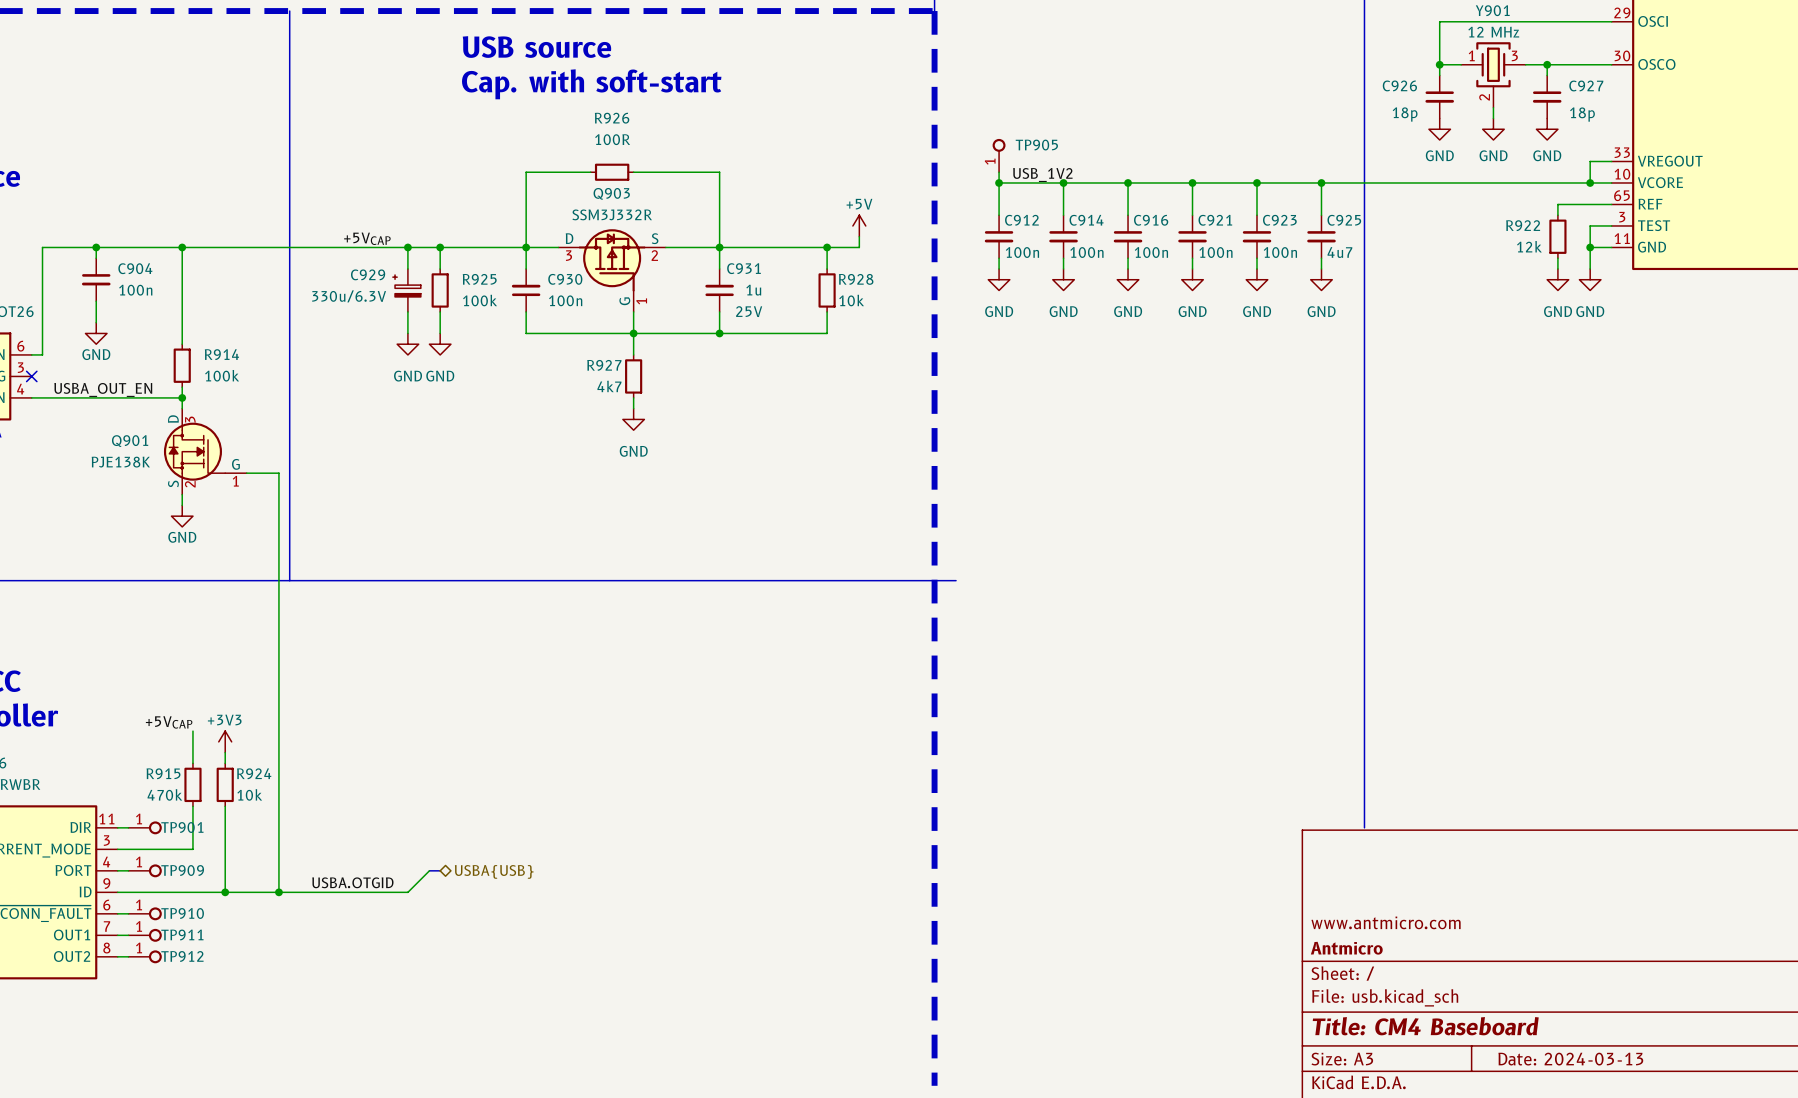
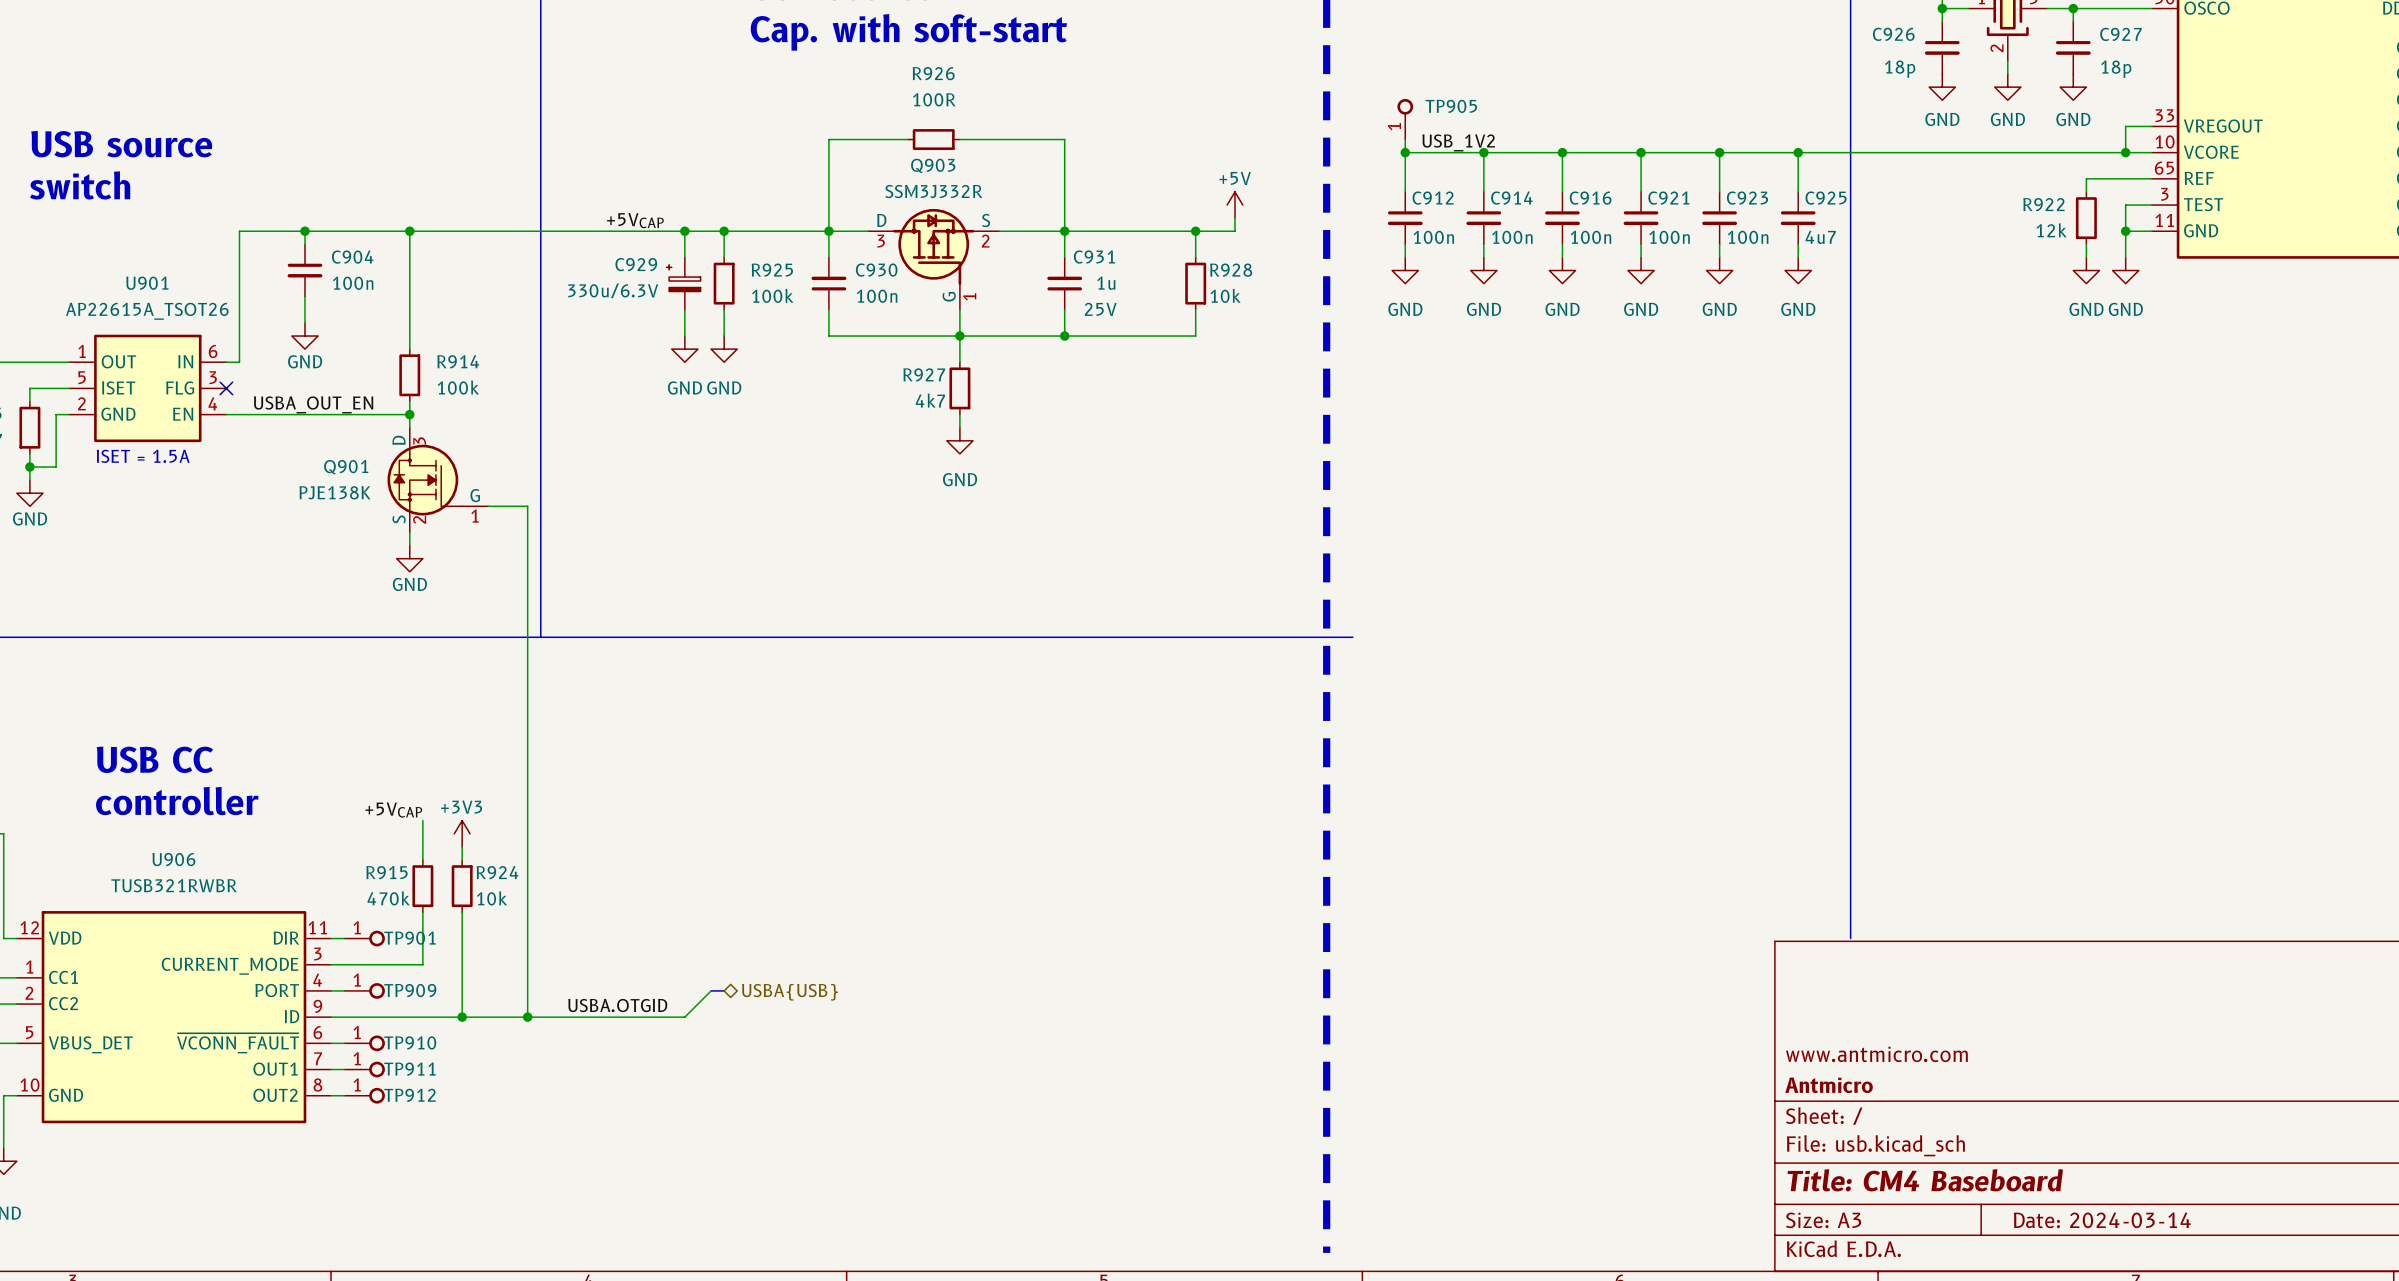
title block: Date: 2024-03-13 (1570, 1059) -> Date: 2024-03-14 (2102, 1220)

